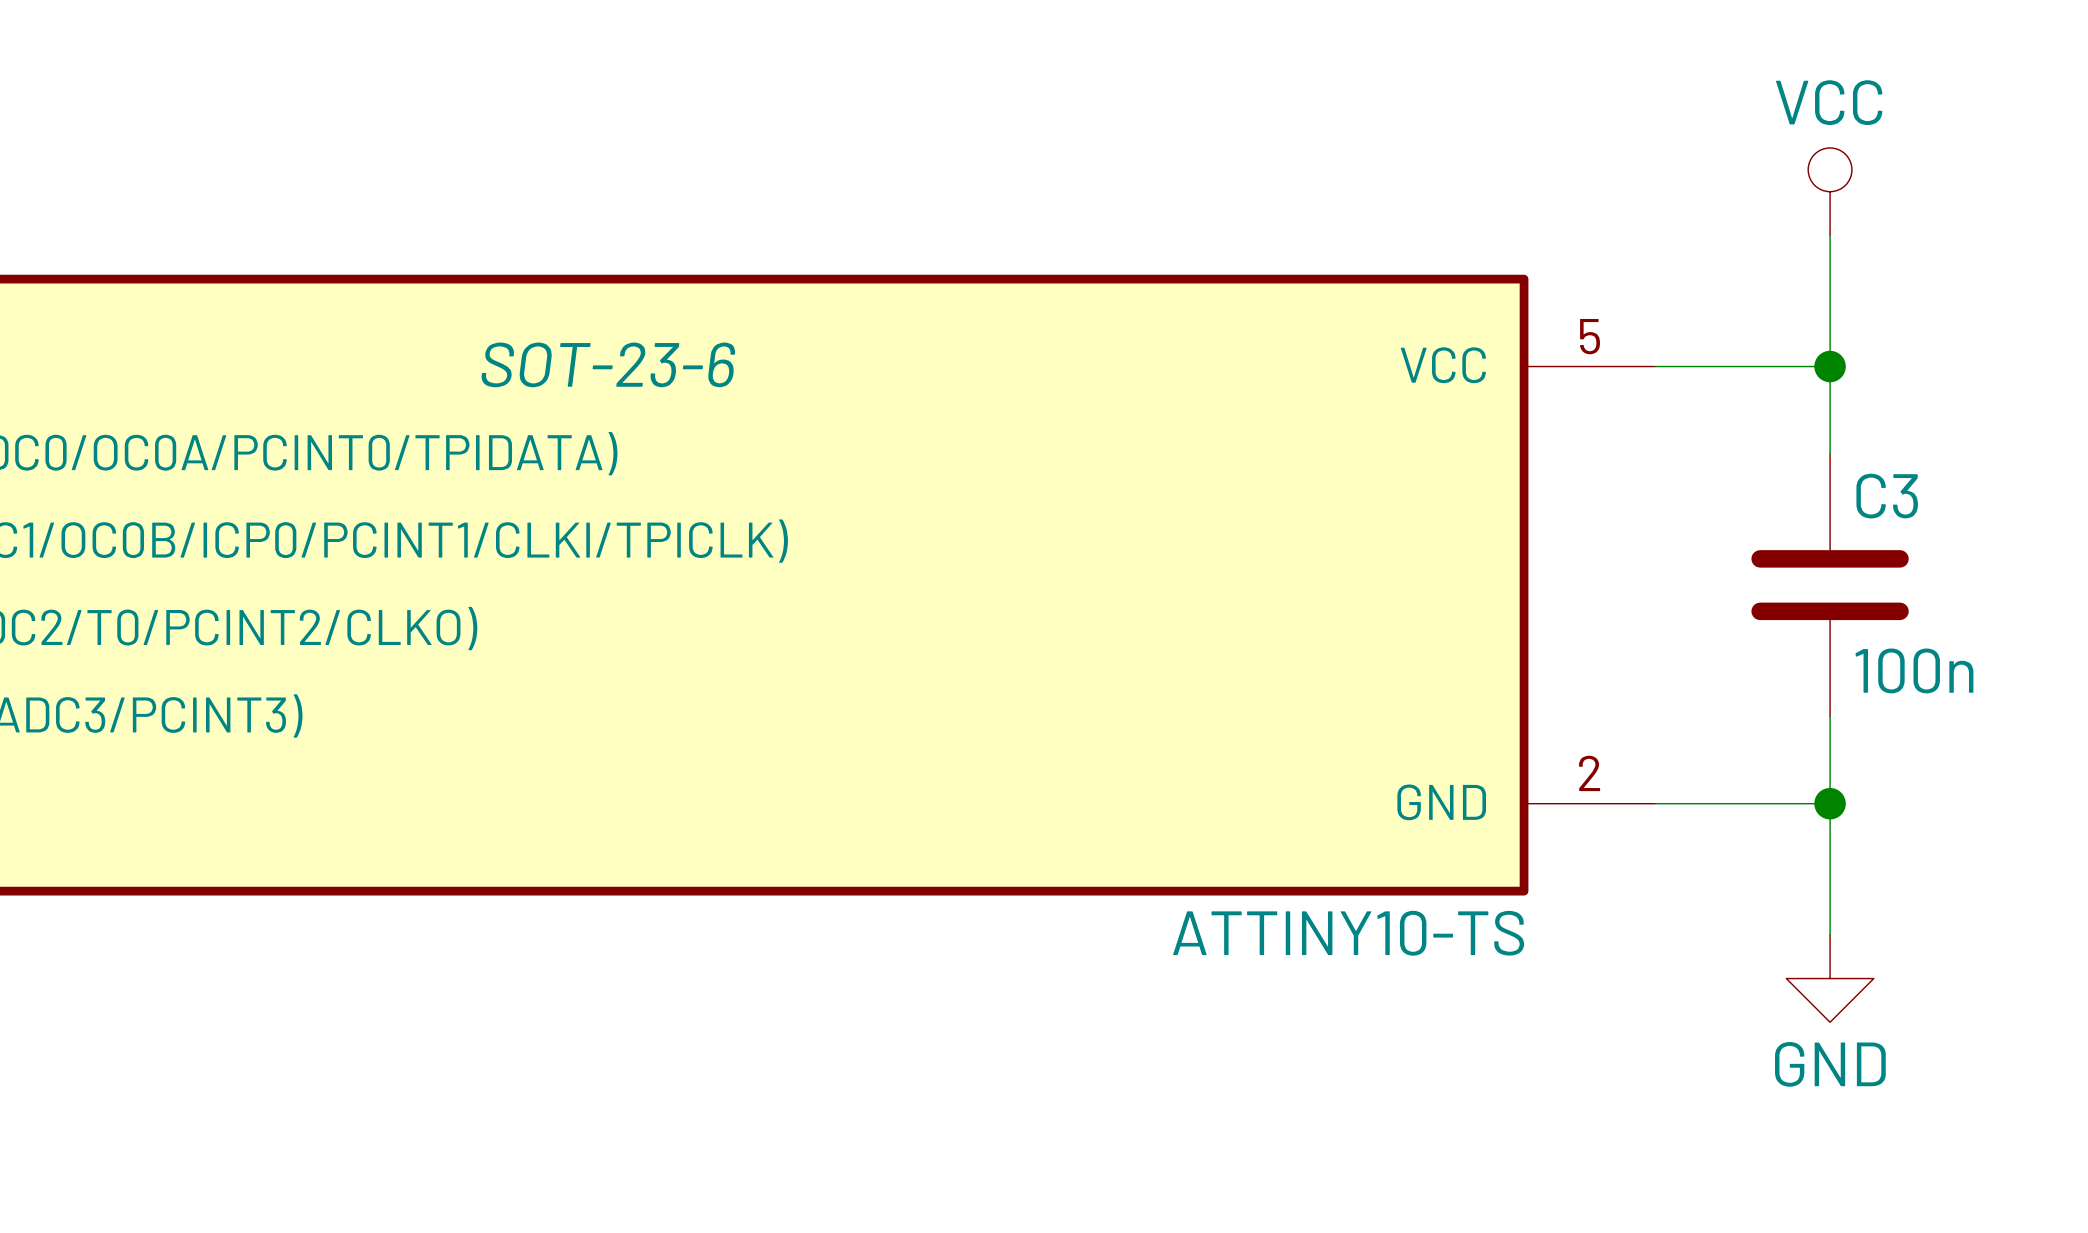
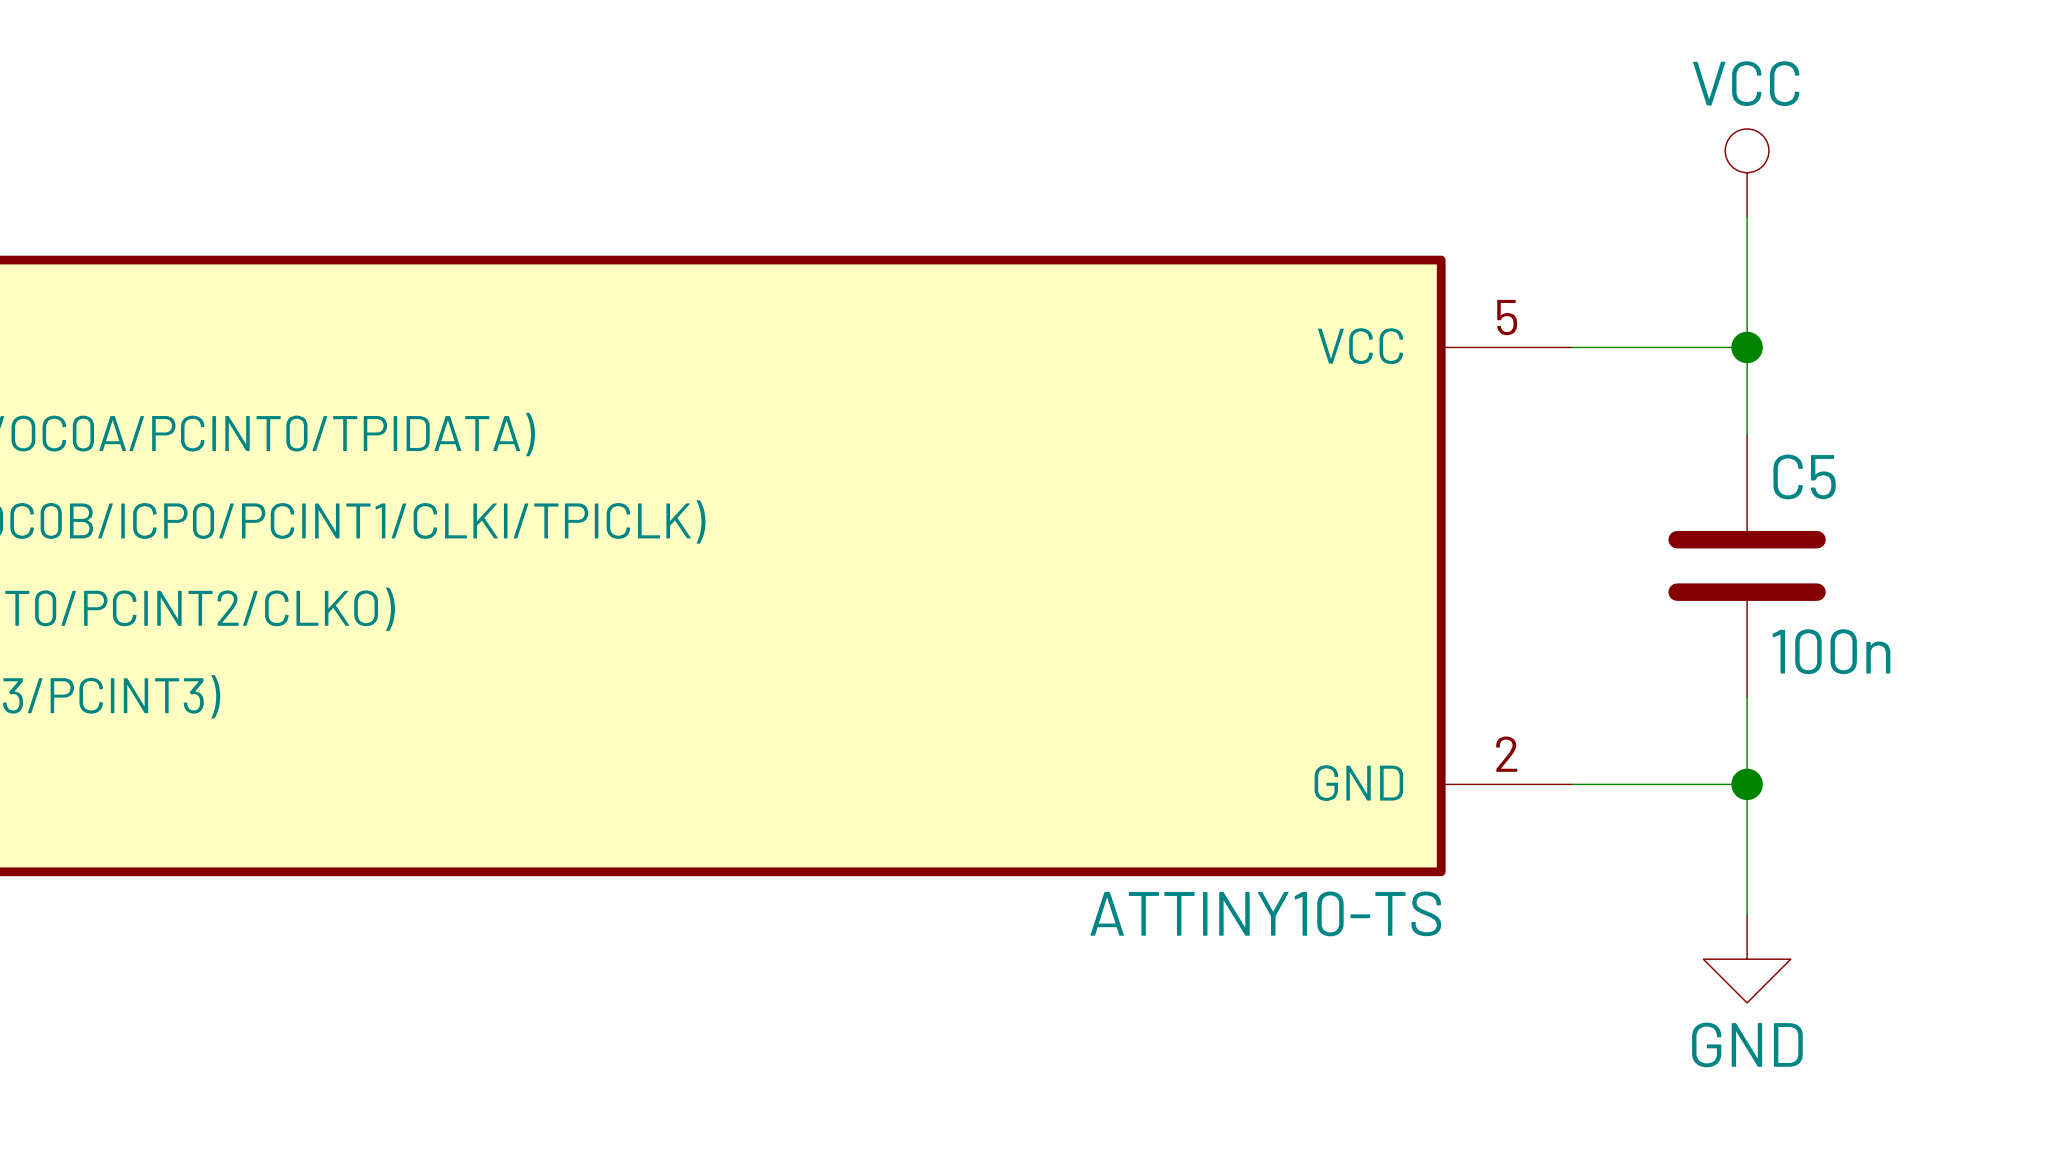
part text: SOT-23-6 (608, 364) -> none
C3 name: C3 (1887, 496) -> C5 (1804, 476)

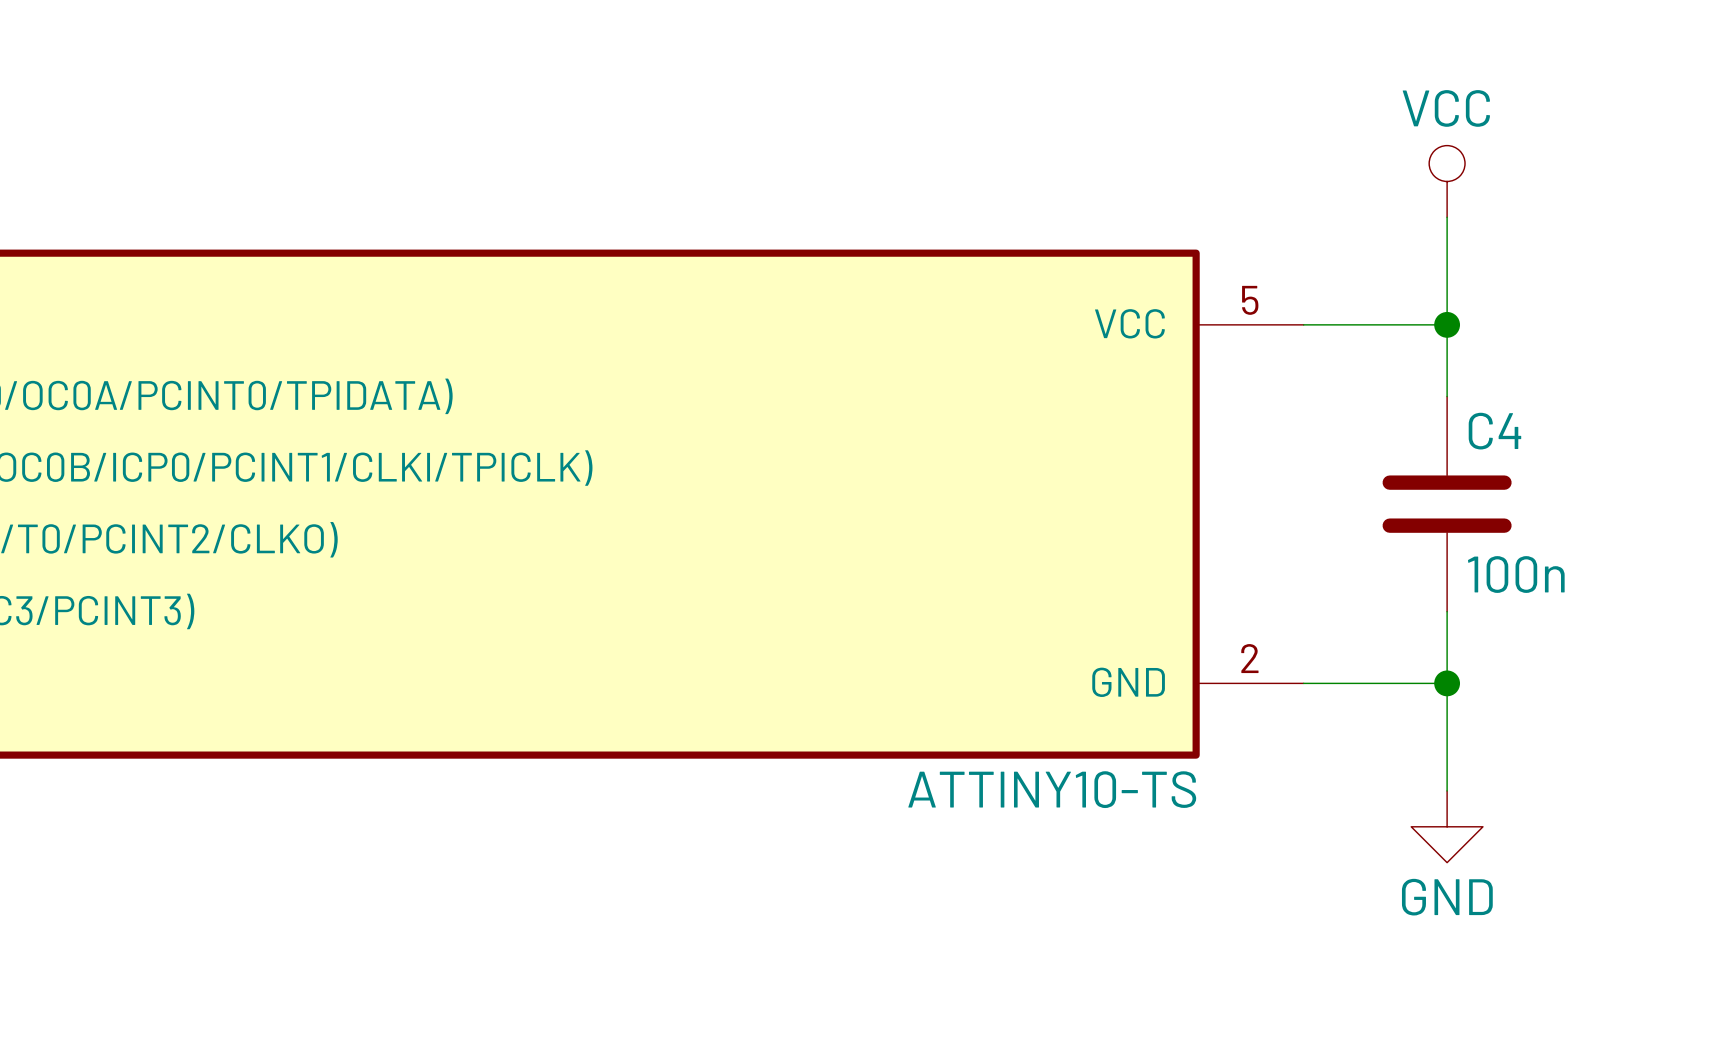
C5 name: C5 (1804, 476) -> C4 (1494, 431)

